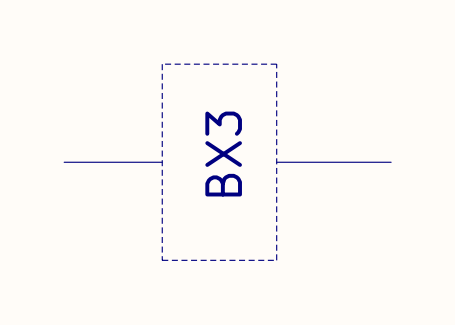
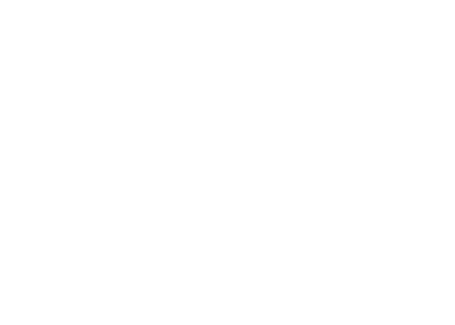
line: (162, 64) (162, 260) (276, 260) (276, 64) (162, 64) -> none
text: BX3 (223, 154) -> none
wire: (64, 162) (162, 162) -> none
wire: (276, 162) (391, 162) -> none

